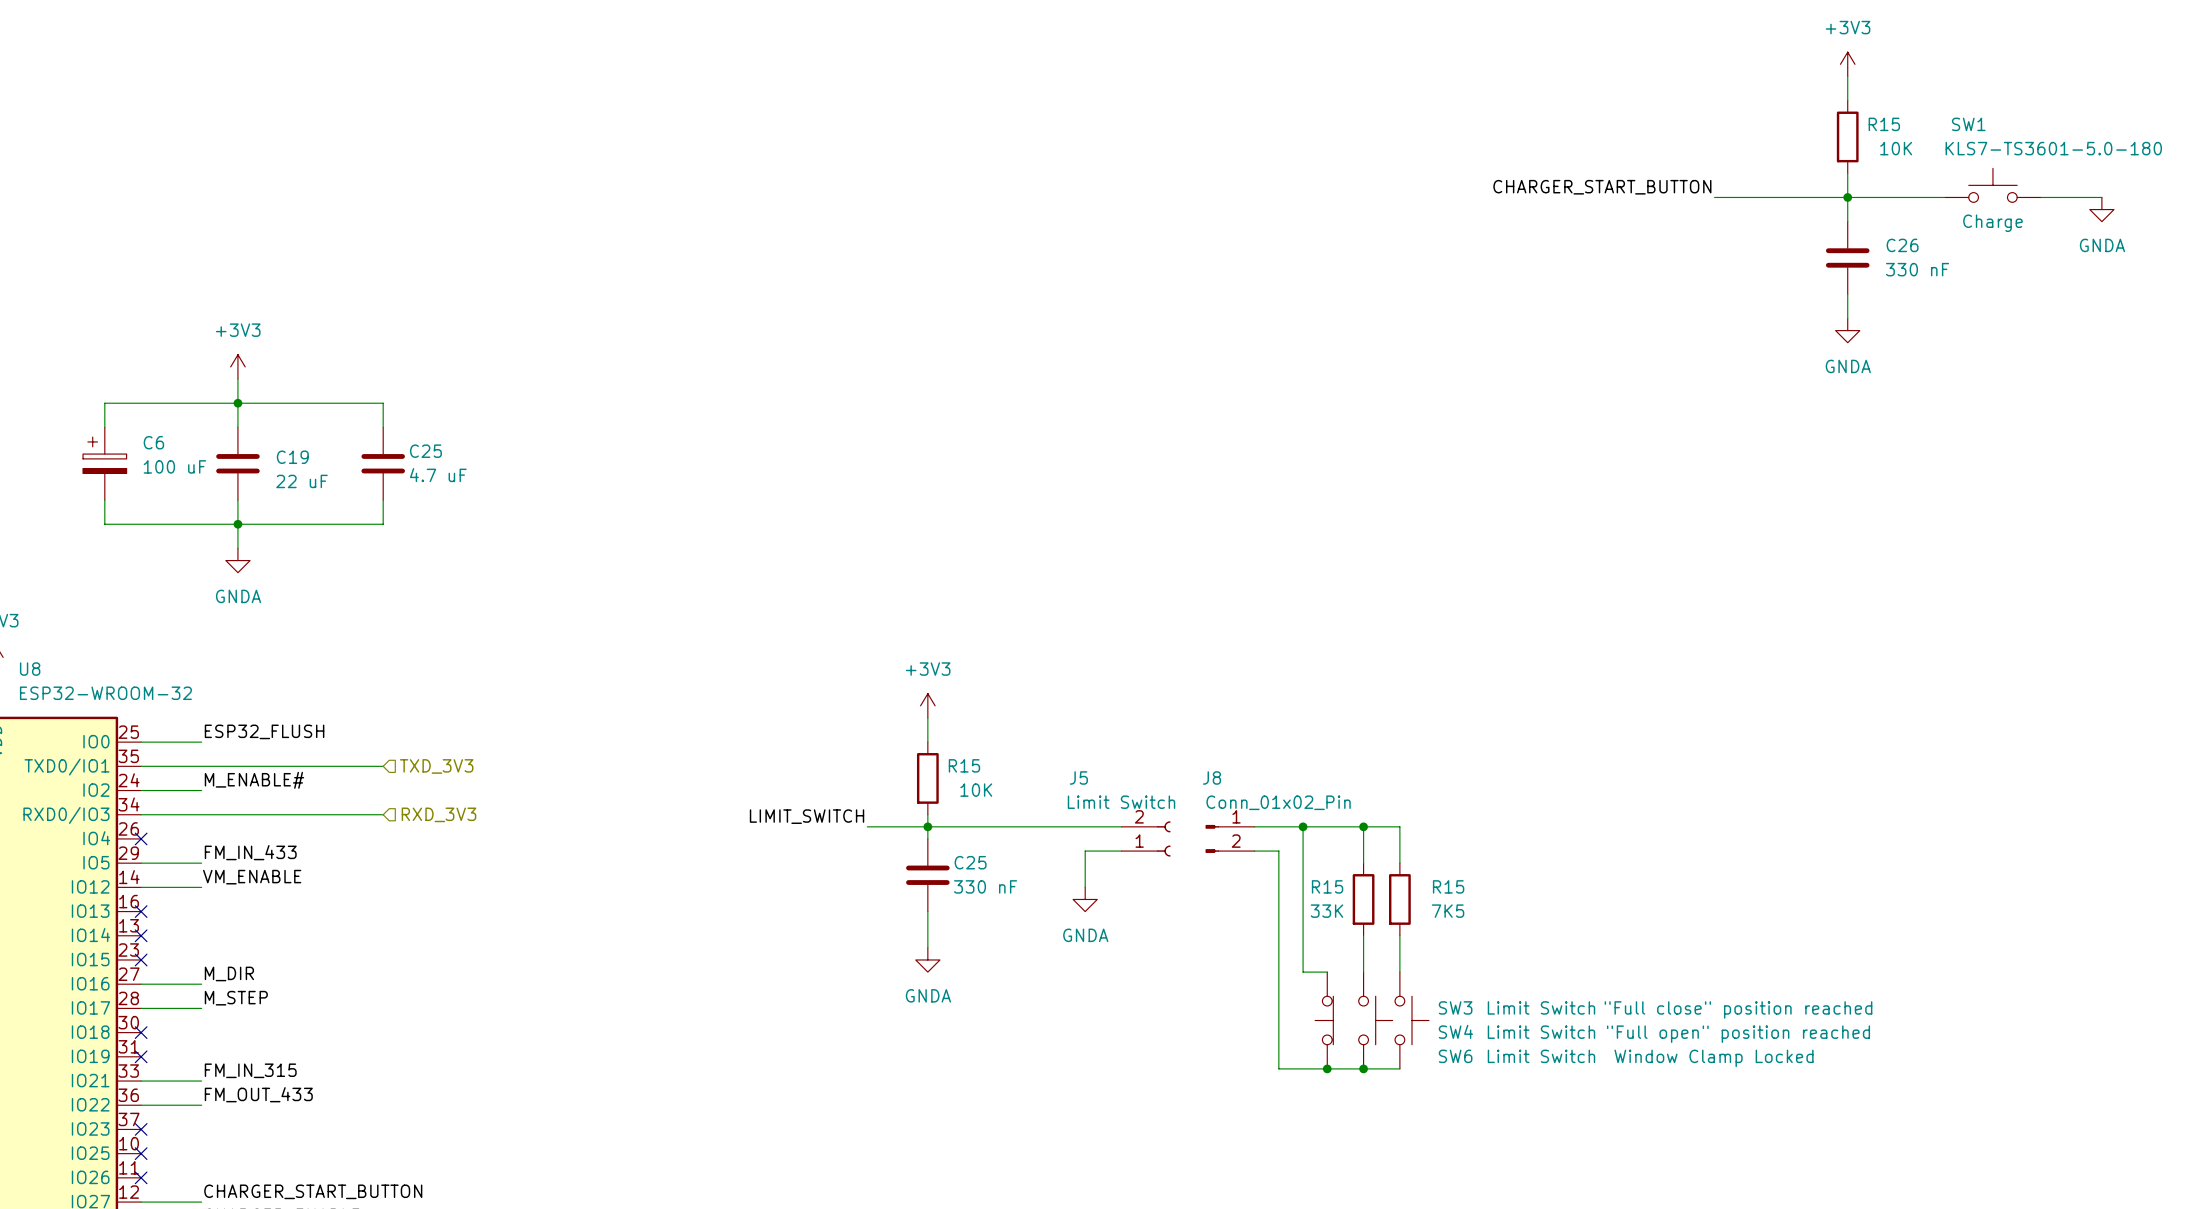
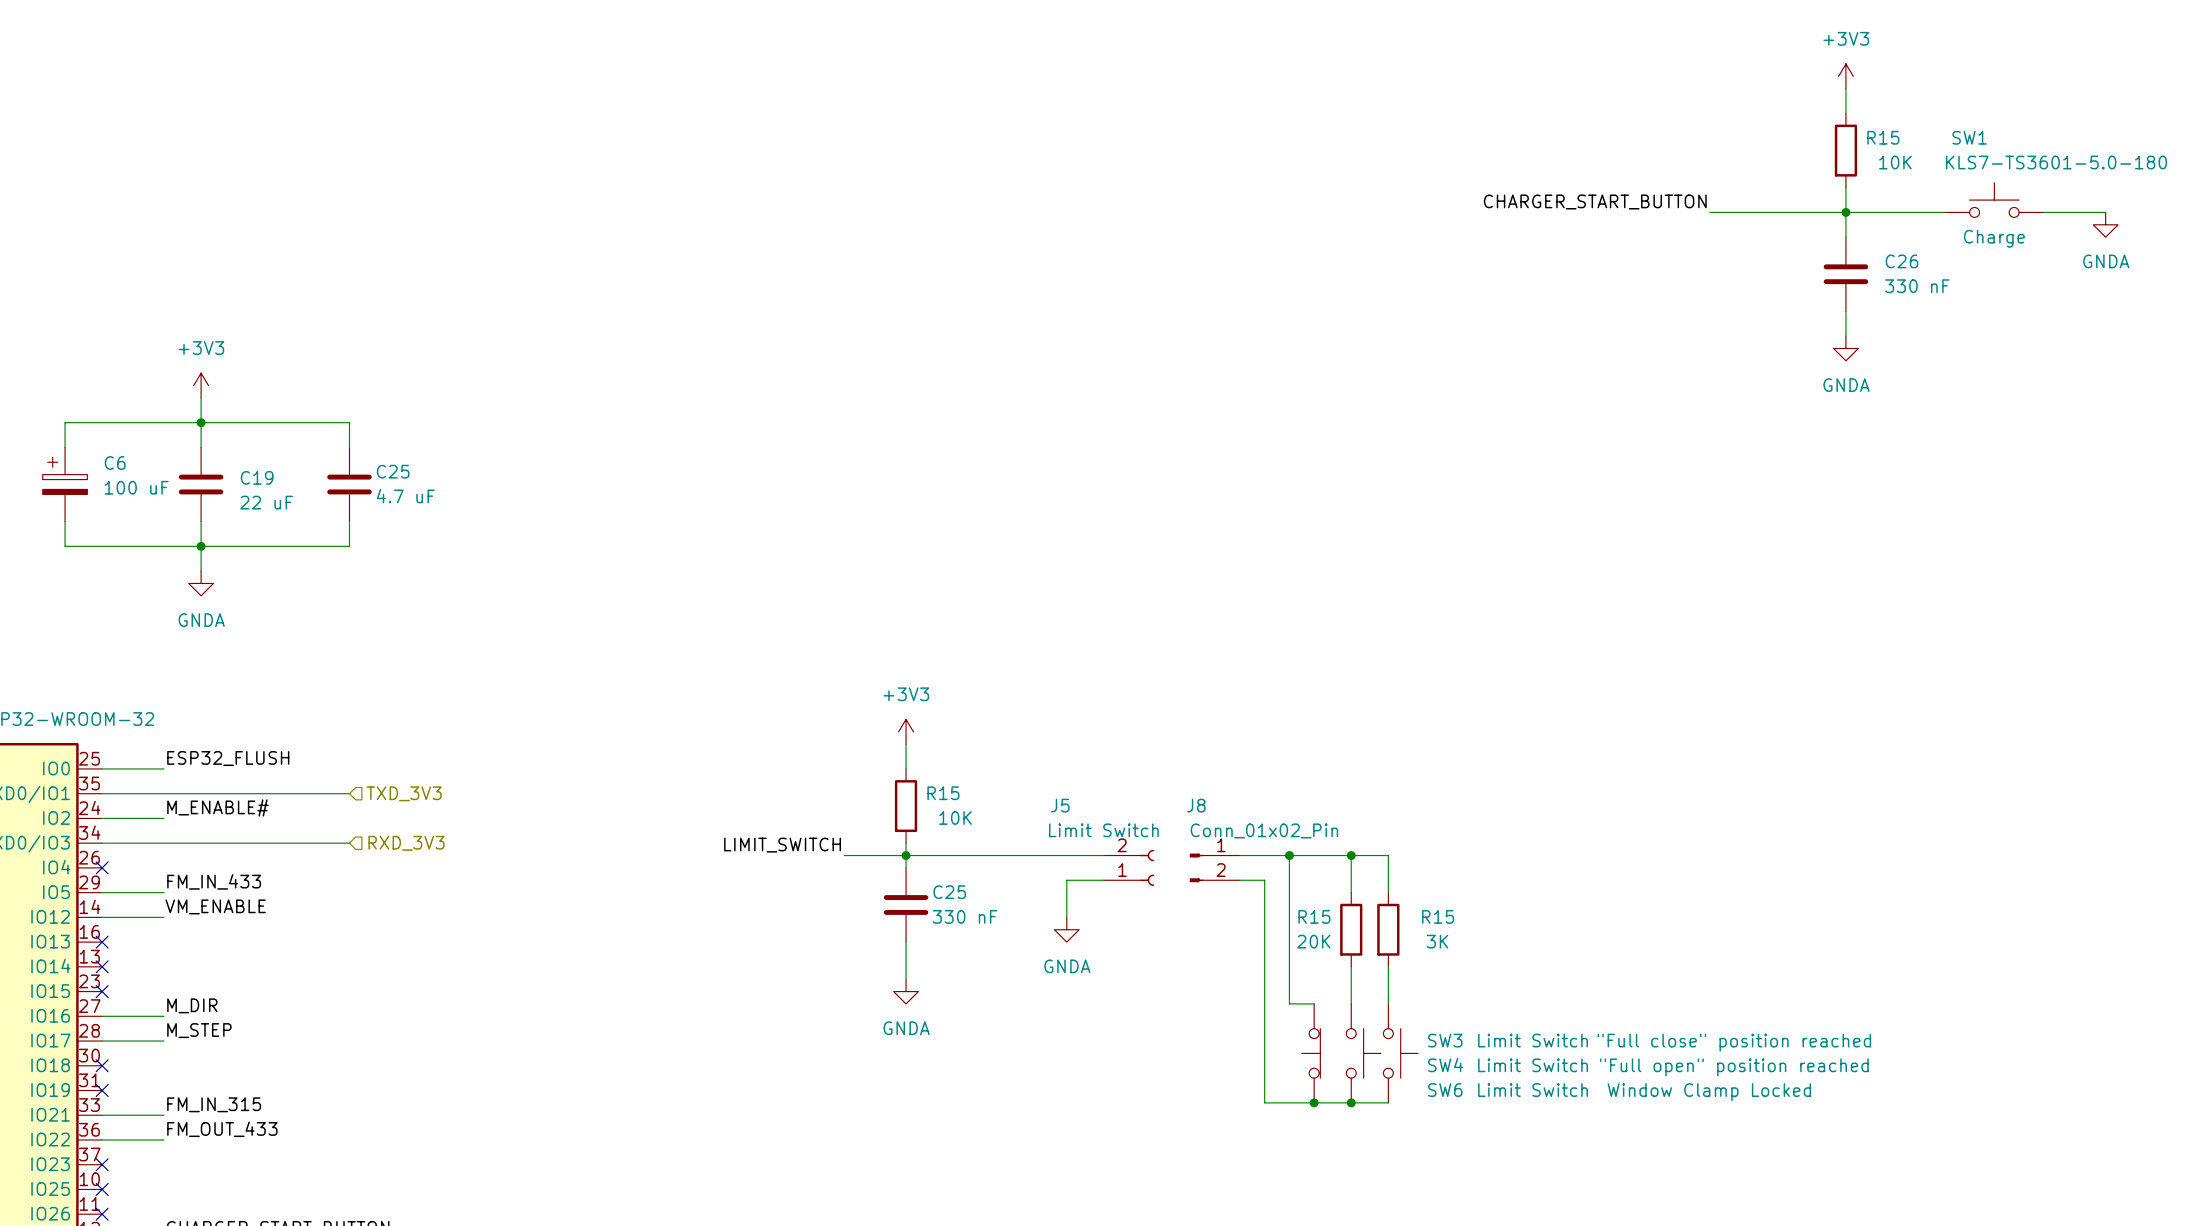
R15 value: 33K (1326, 911) -> 20K (1313, 941)
R15 value: 7K5 (1448, 911) -> 3K (1437, 941)

